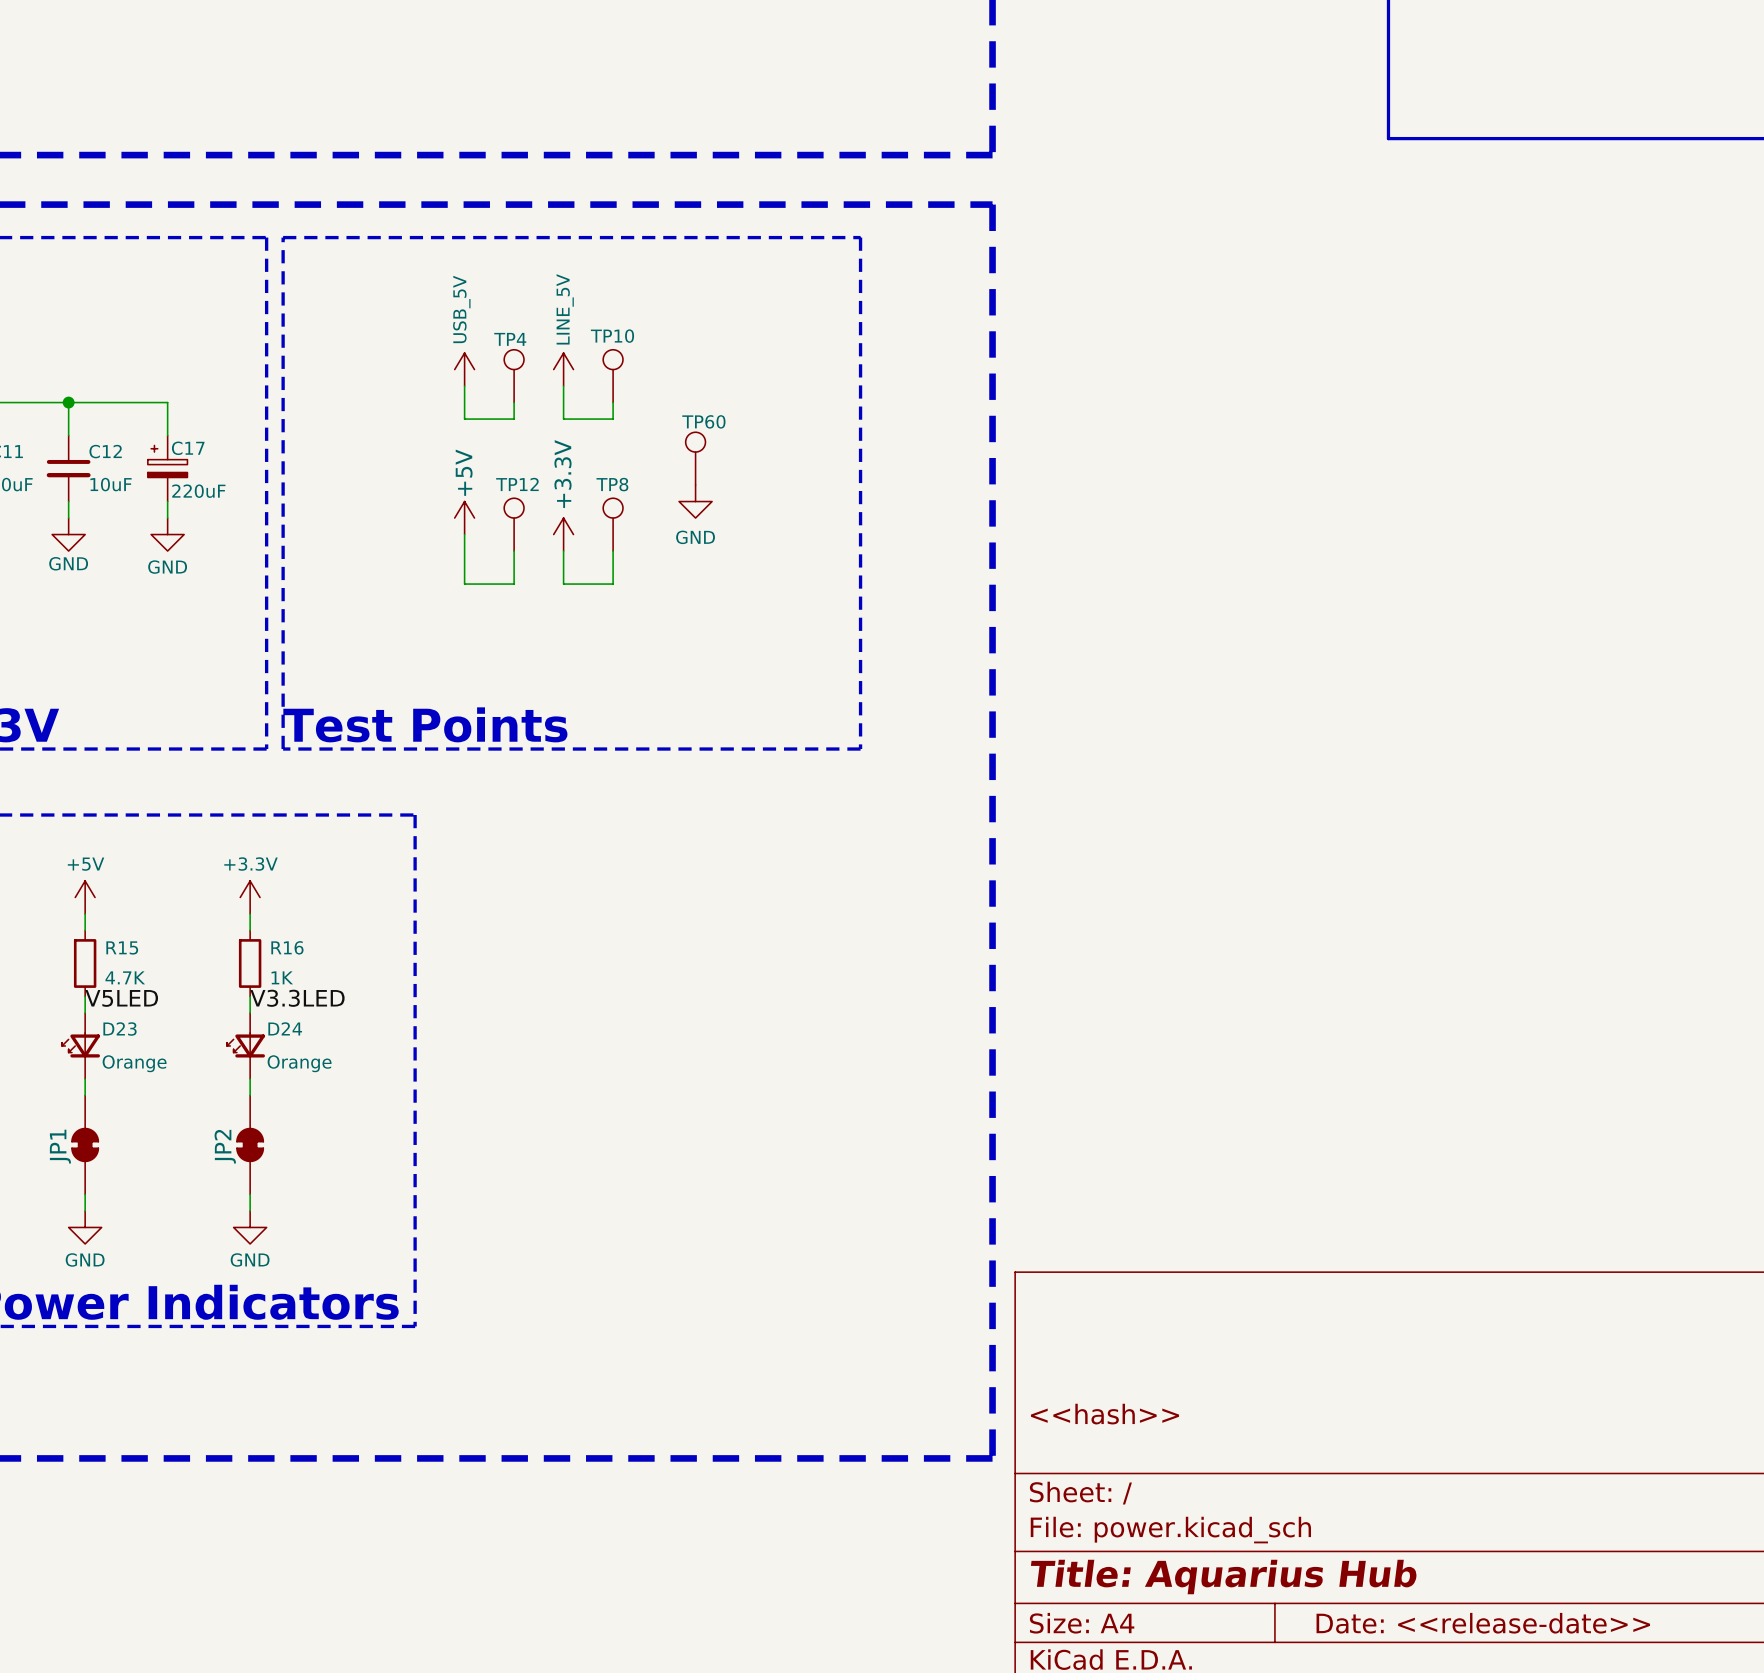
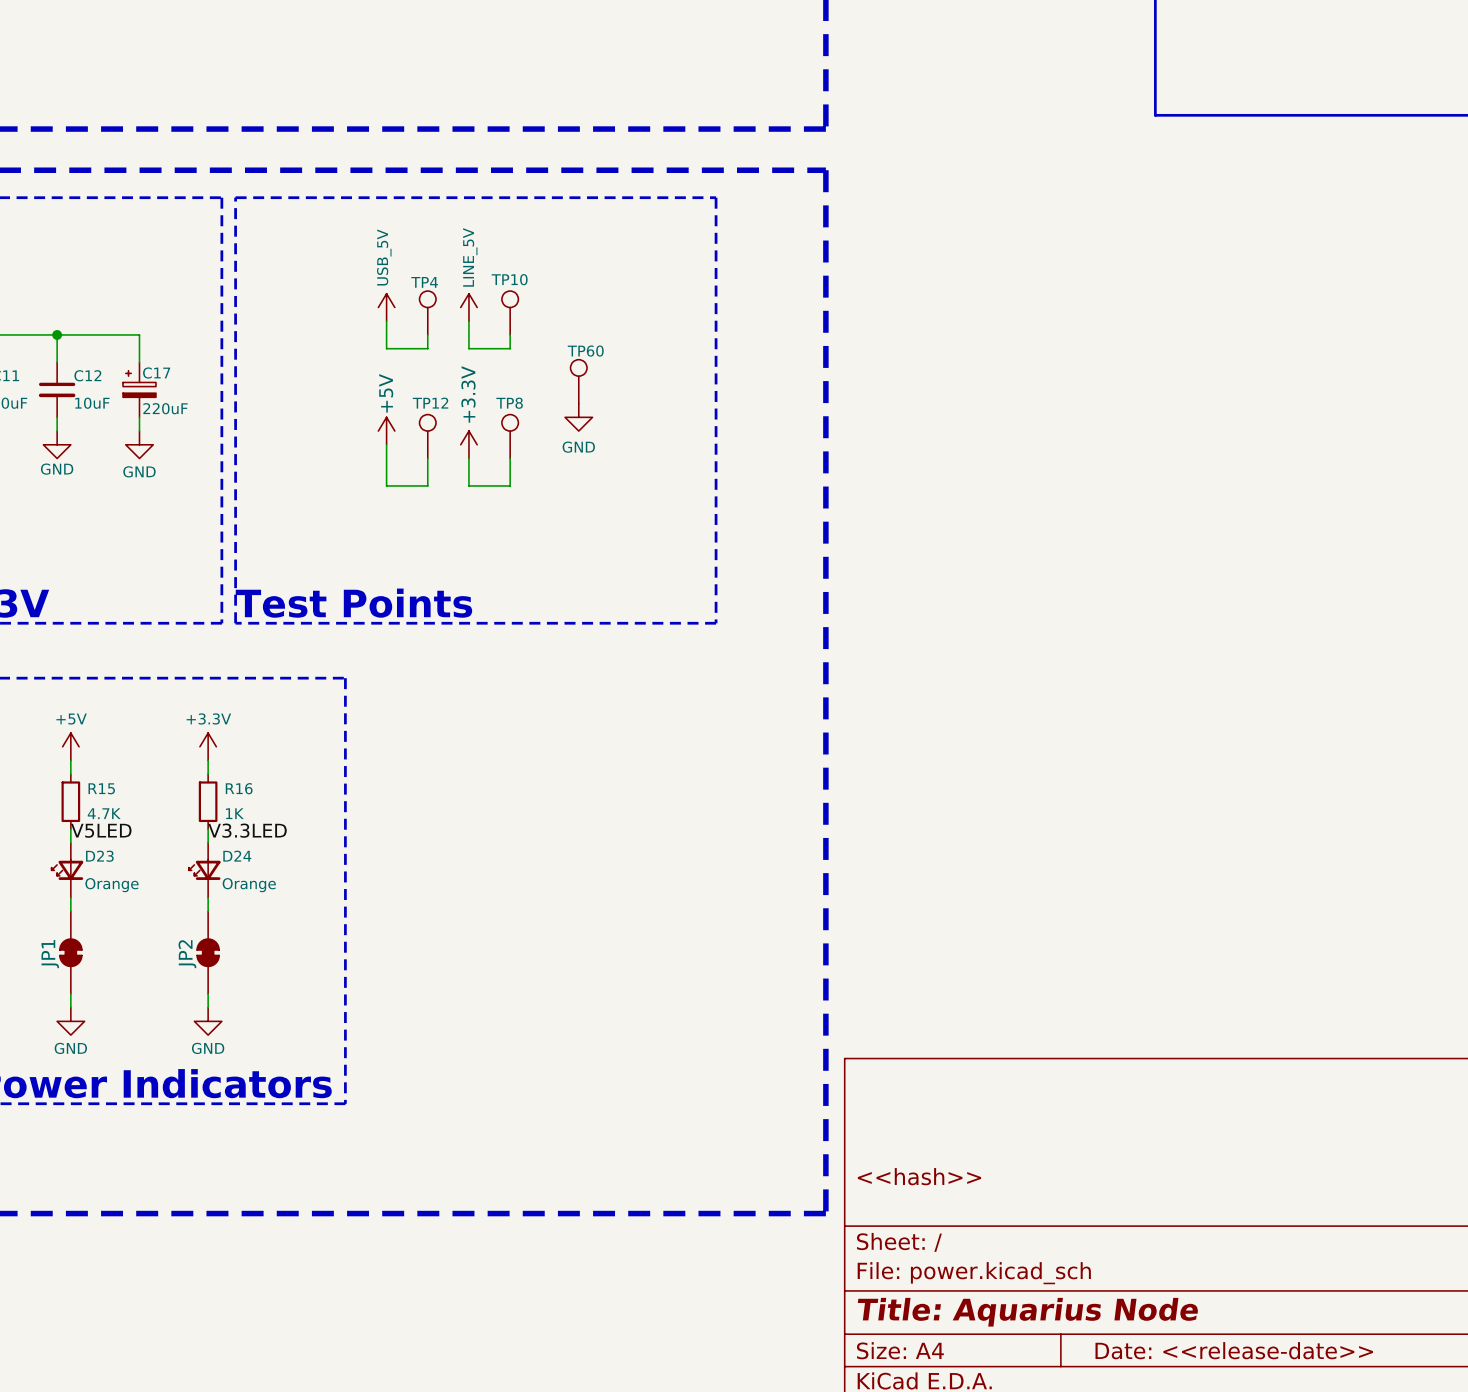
title block: Title: Aquarius Hub (1223, 1577) -> Title: Aquarius Node (1028, 1312)

